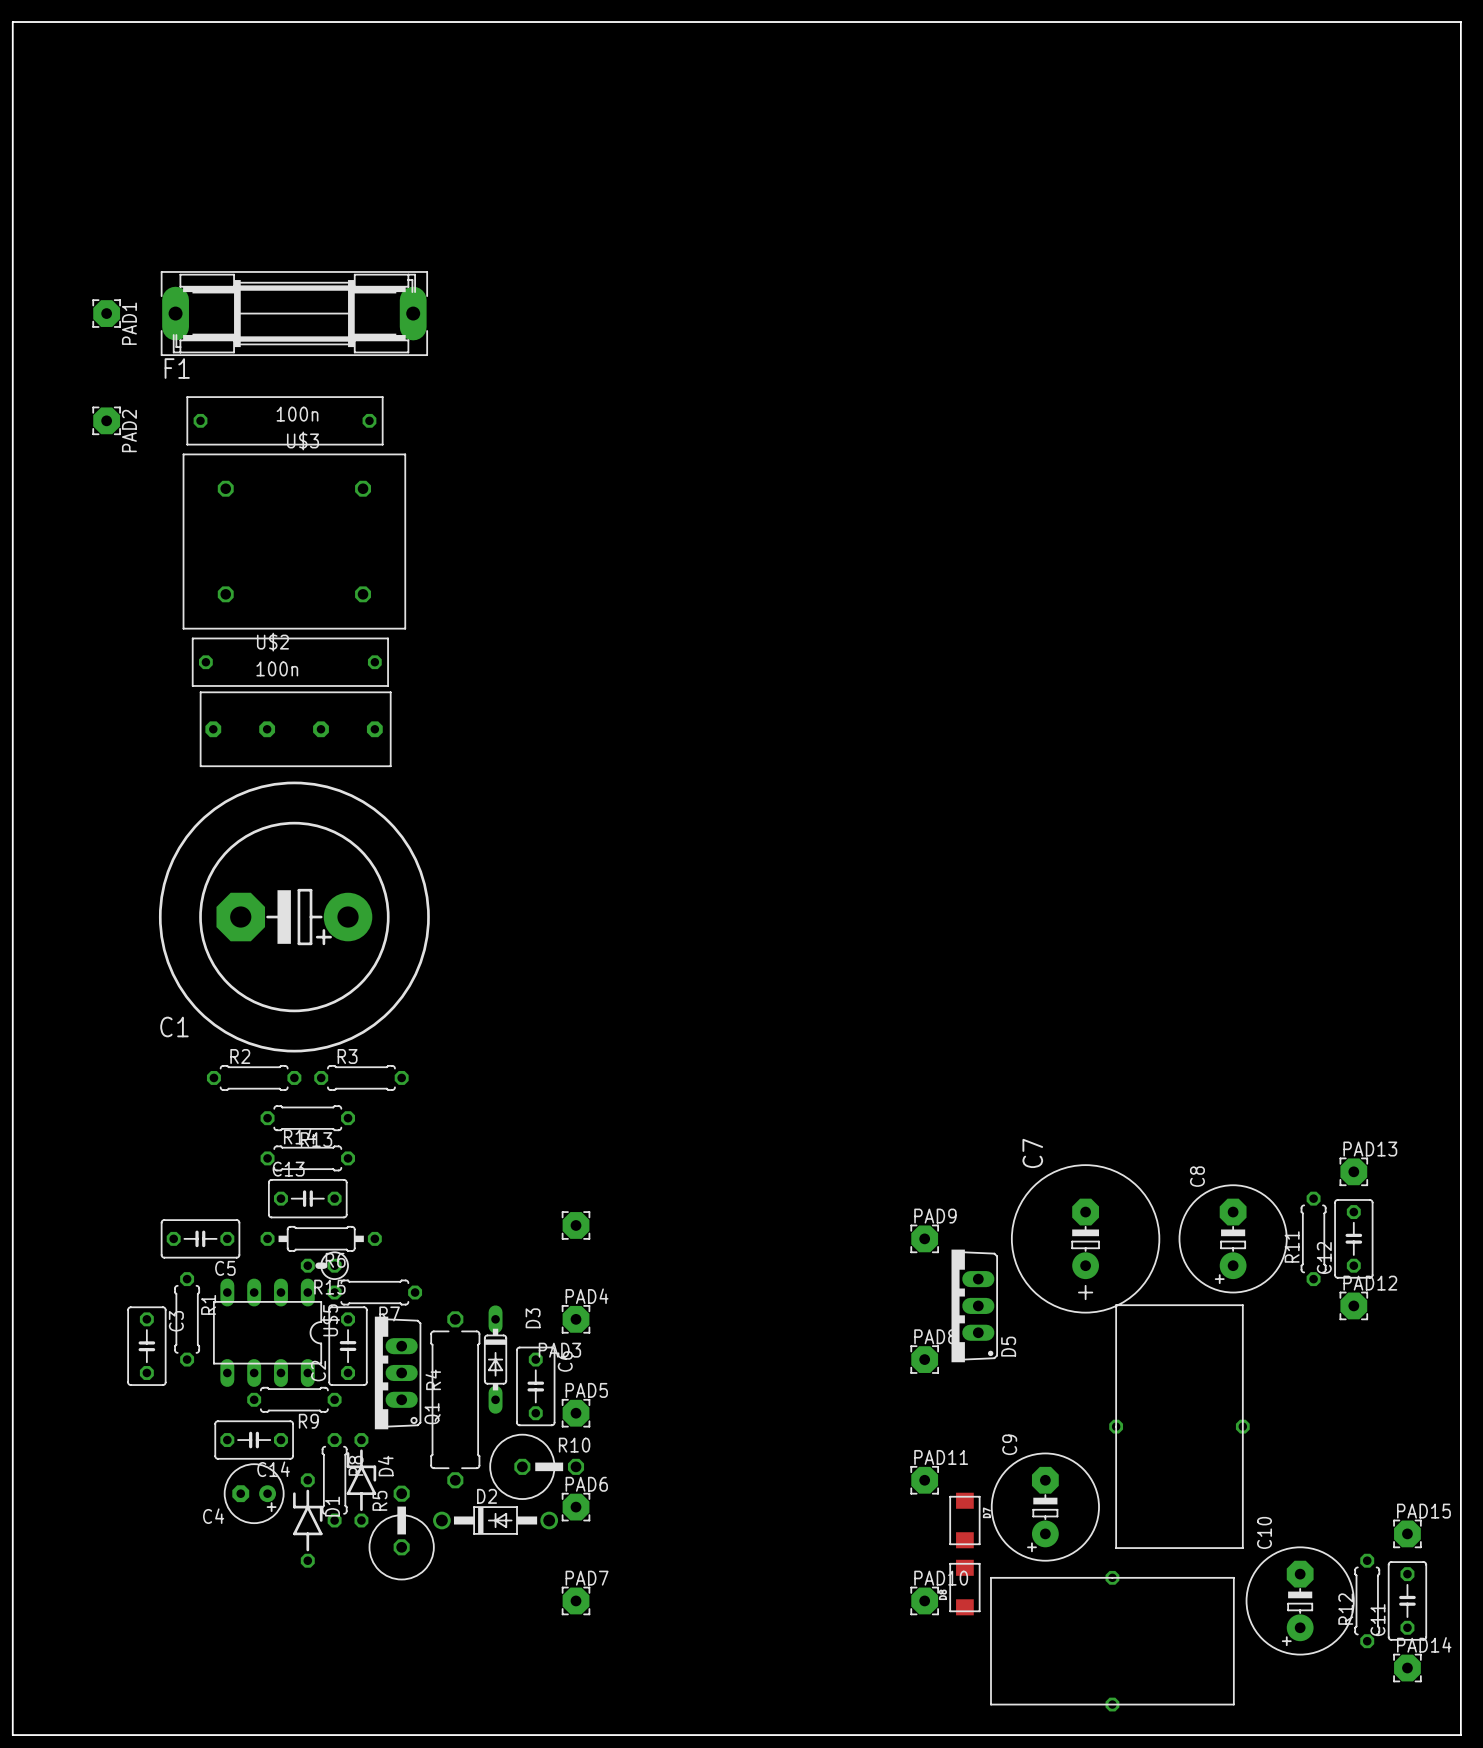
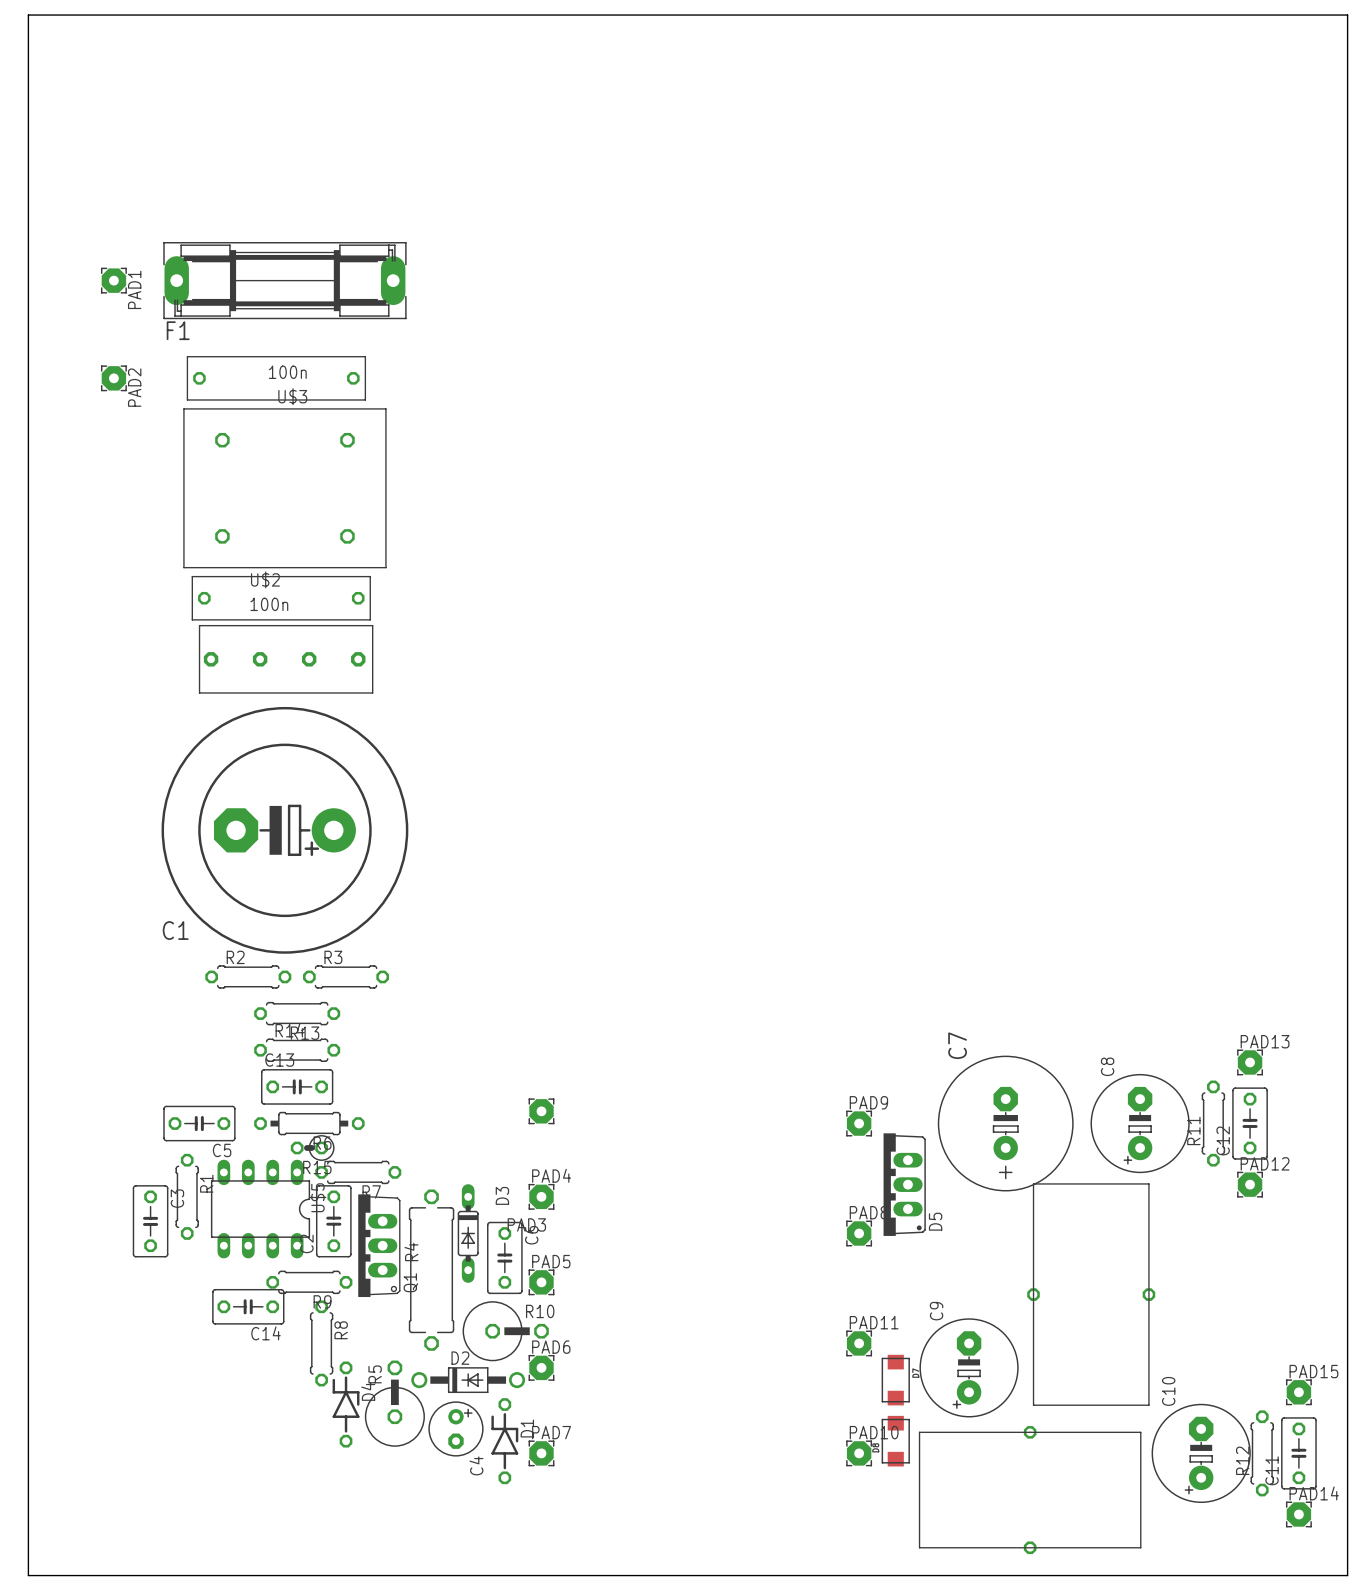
R9 position: (294, 1399) -> (309, 1282)
D4 position: (361, 1480) -> (346, 1404)
C4 rotation: 0° (254, 1493) -> 90° counterclockwise (455, 1428)
C4 position: (254, 1493) -> (455, 1428)
D1 position: (307, 1520) -> (504, 1441)
R5 position: (401, 1532) -> (394, 1403)

